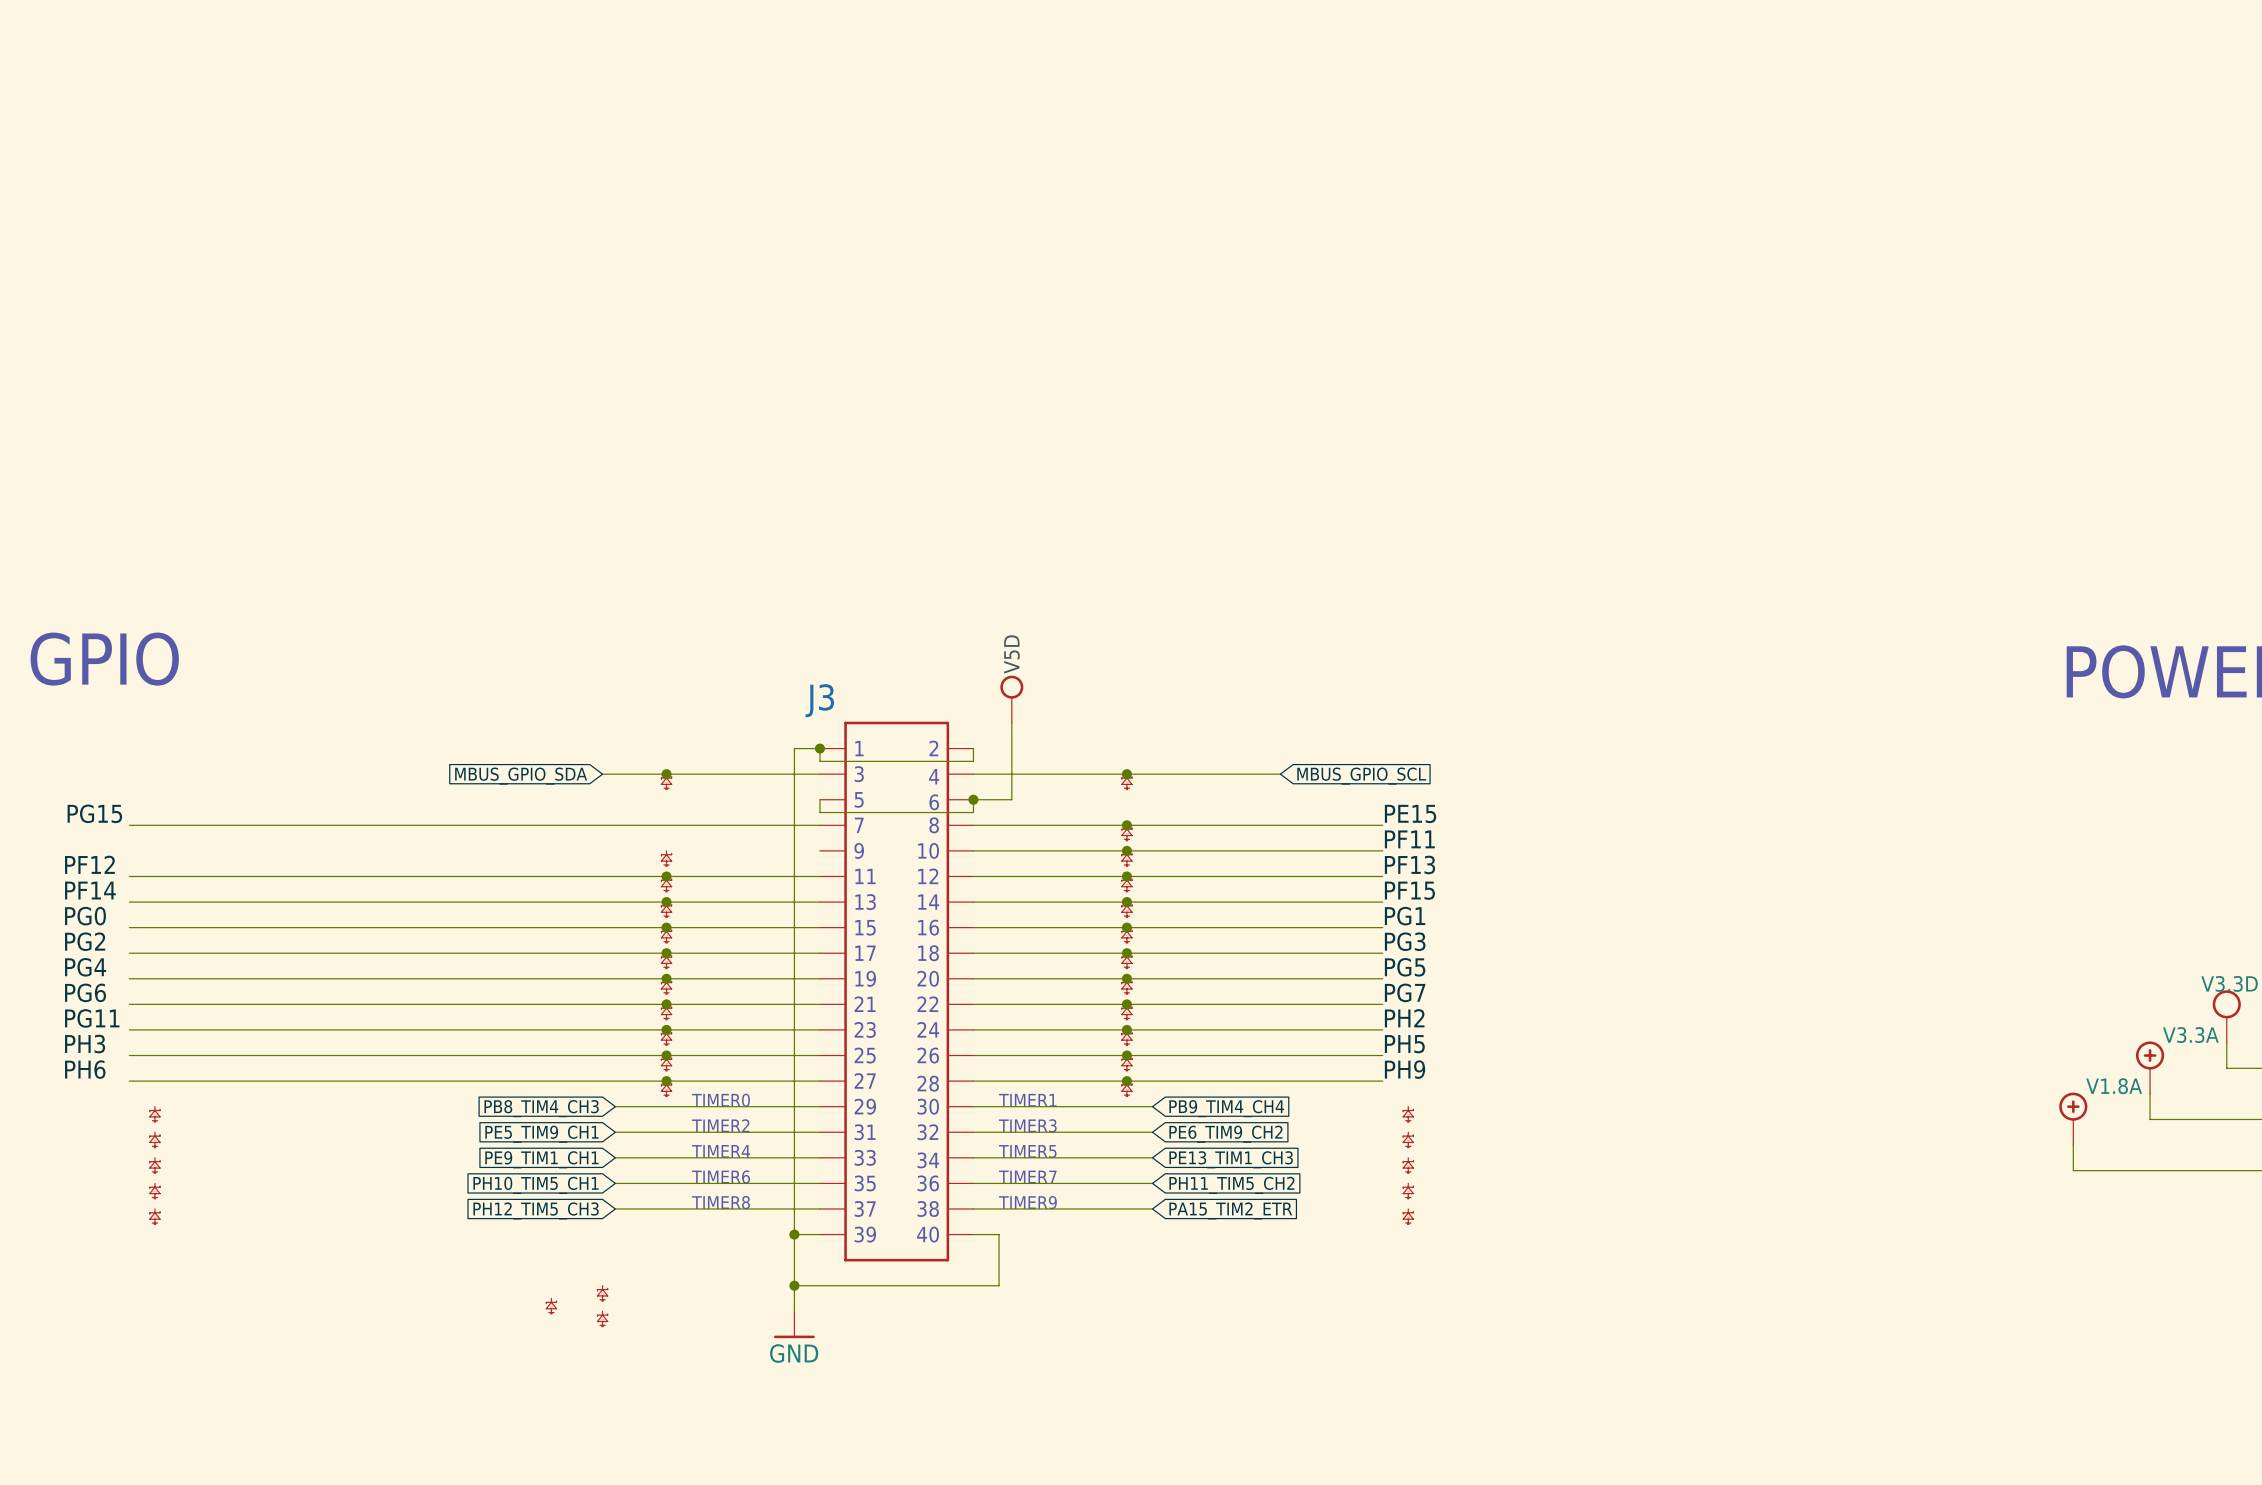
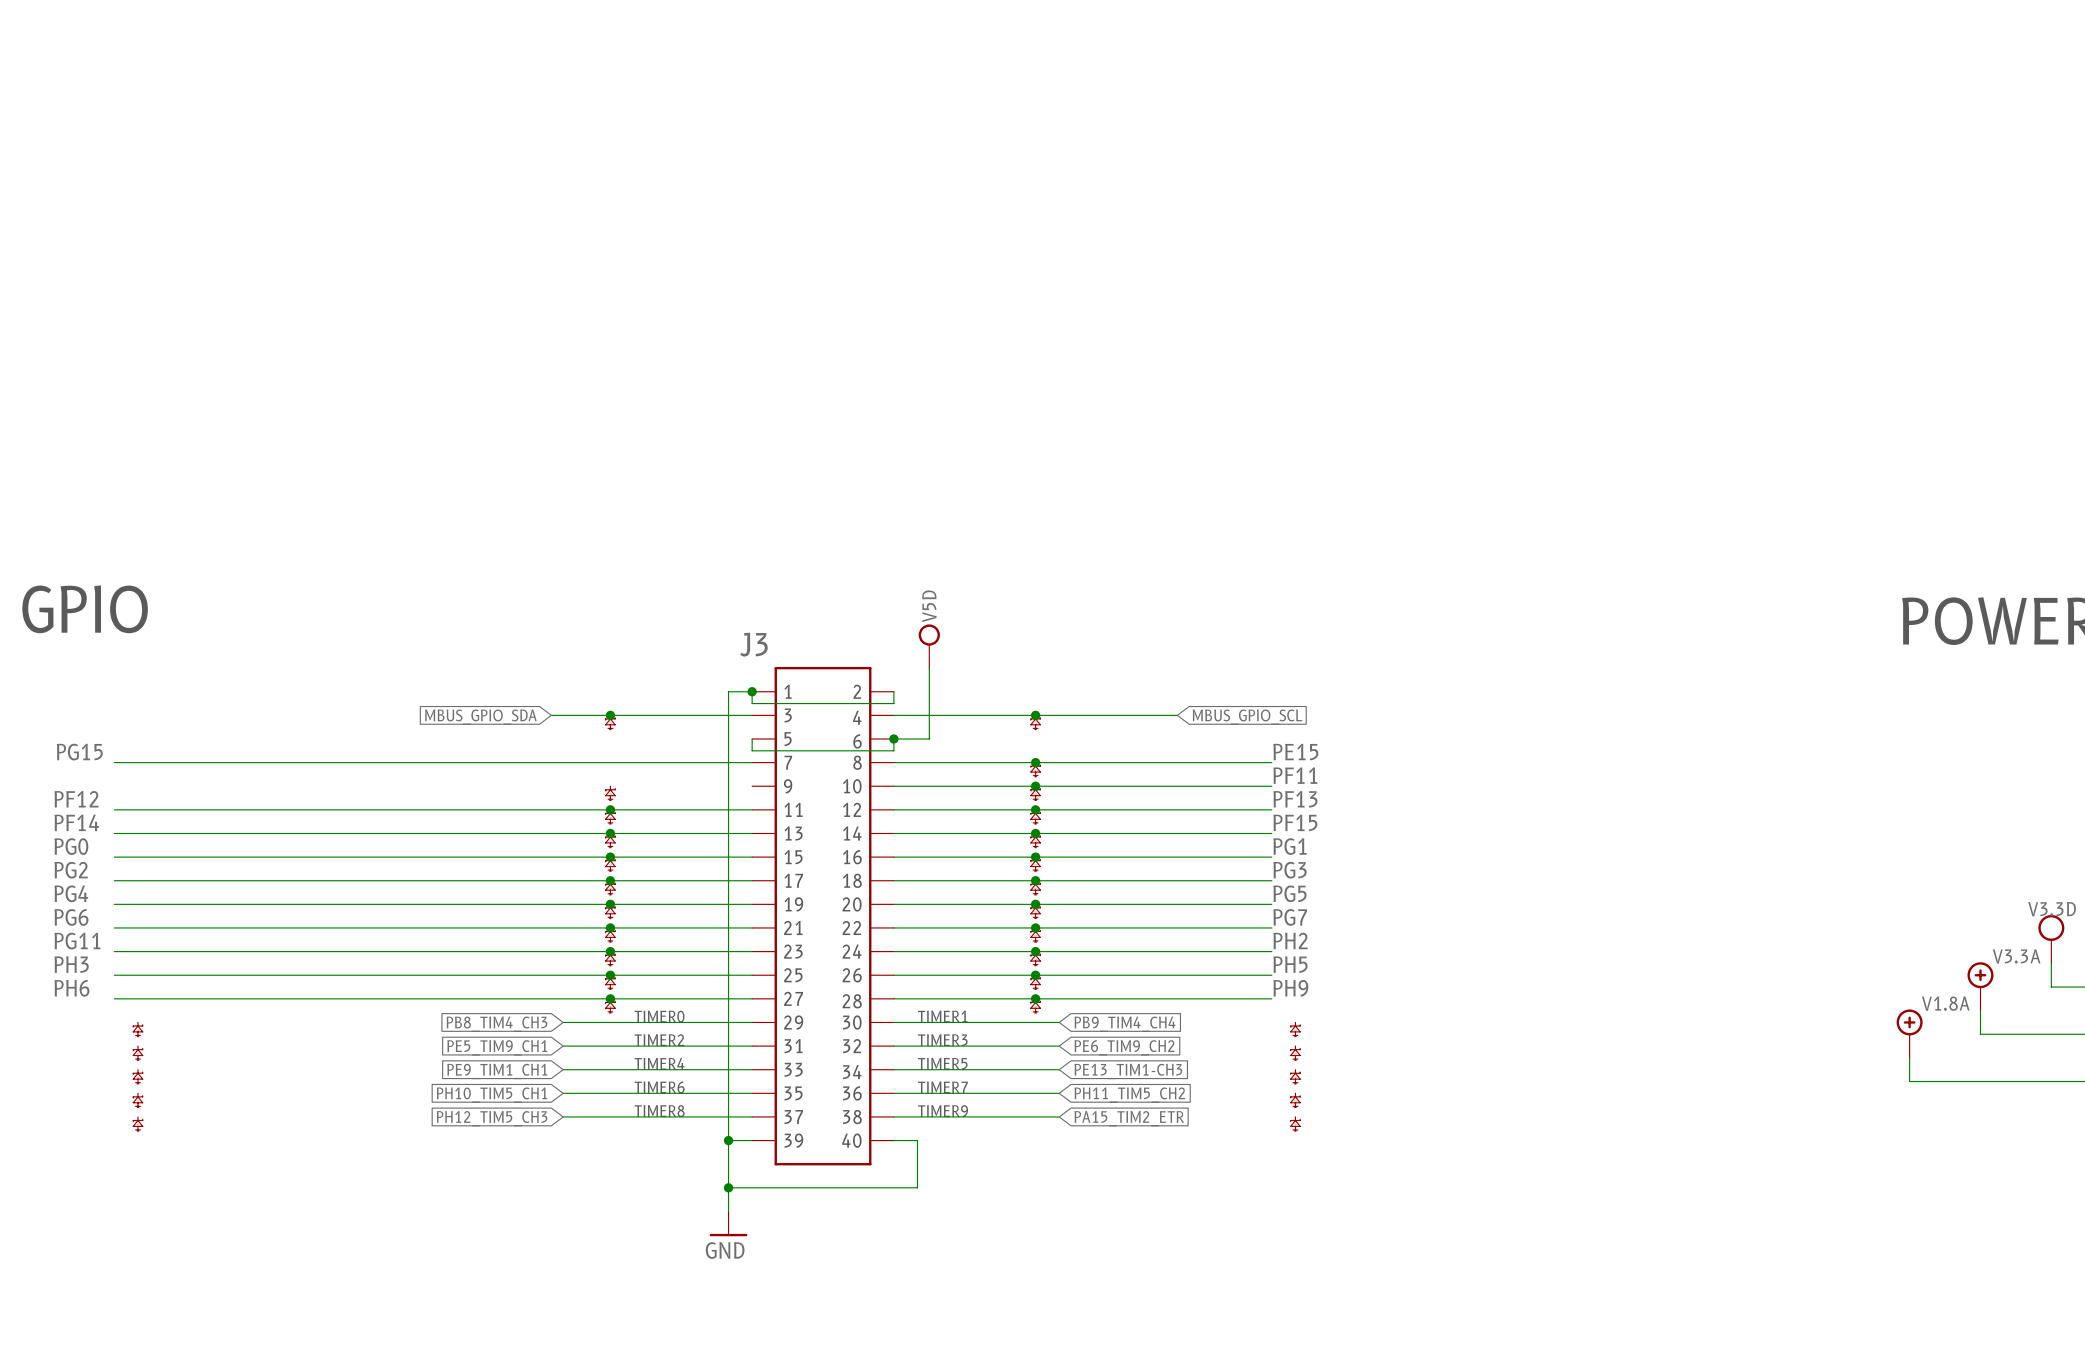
global label: PE13_TIM1_CH3 (1231, 1159) -> PE13_TIM1-CH3 (1128, 1071)
part: (602, 1293) -> none
part: (551, 1306) -> none
part: (602, 1318) -> none

